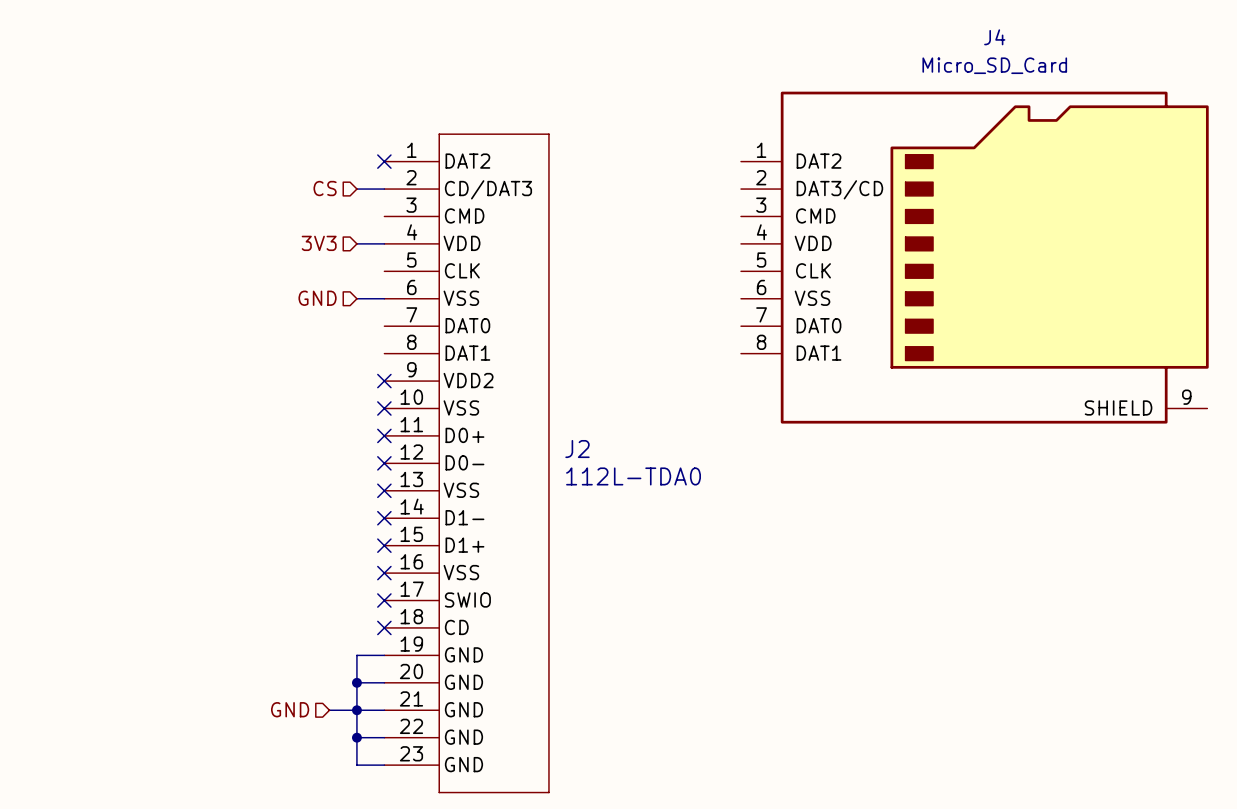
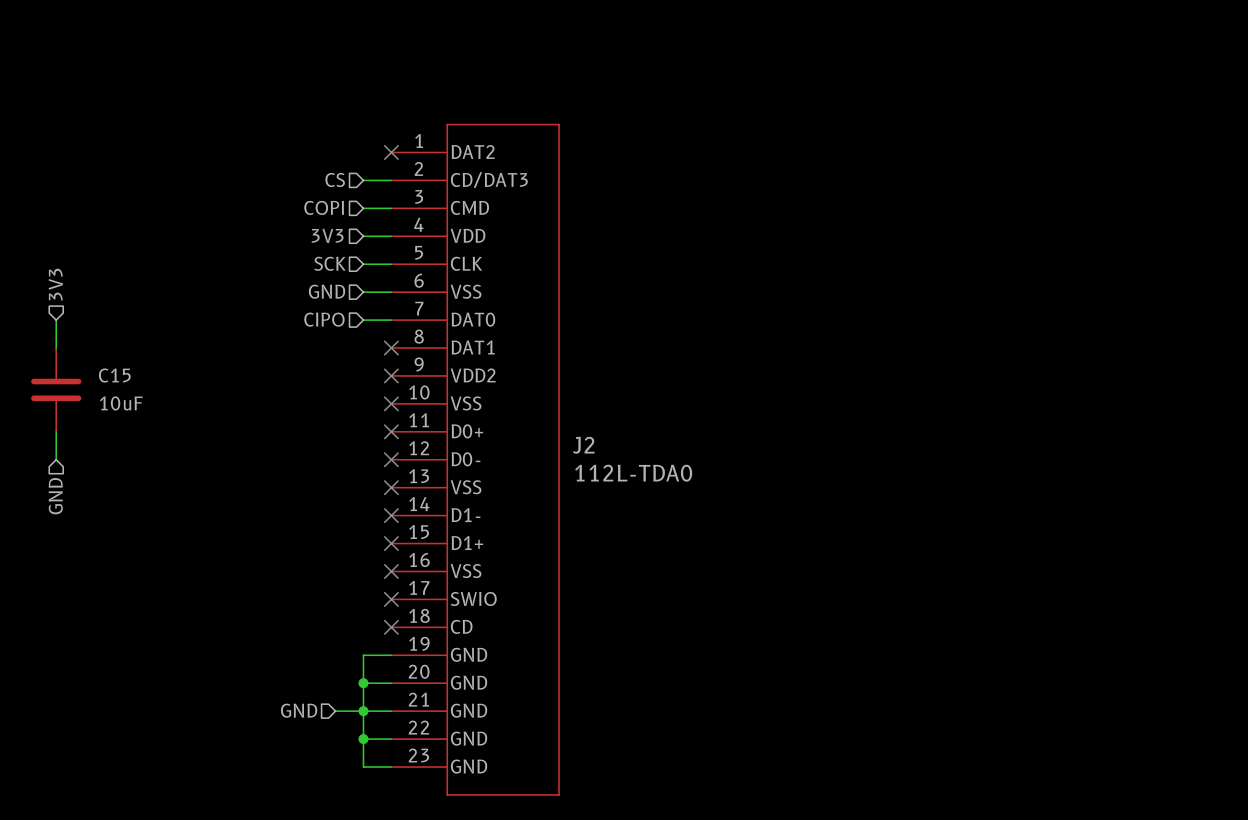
hierarchical label: none -> COPI (324, 207)
wire: none -> (363, 208) (391, 208)
J4: Micro_SD_Card (974, 257) -> none
hierarchical label: none -> SCK (329, 263)
wire: none -> (363, 264) (391, 264)
hierarchical label: none -> 3V3 (55, 284)
hierarchical label: none -> CIPO (324, 319)
wire: none -> (56, 320) (56, 348)
wire: none -> (363, 320) (391, 320)
no-connect mark: none -> (391, 348)
C15: none -> 10uF (56, 389)
wire: none -> (56, 431) (56, 459)
hierarchical label: none -> GND (55, 496)

